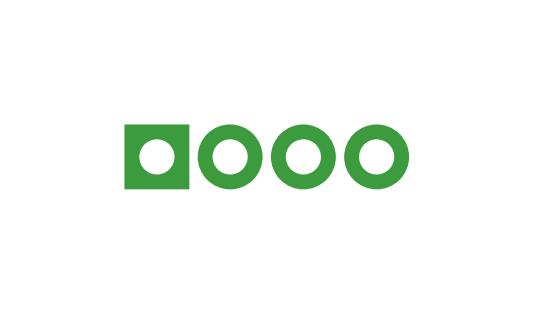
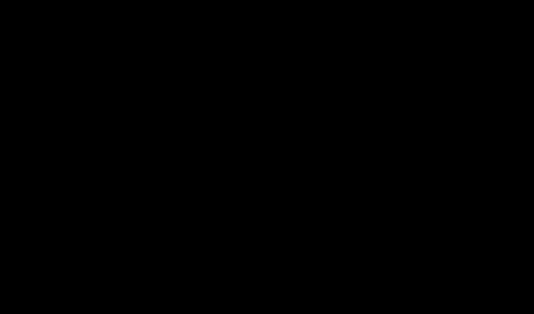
part: (266, 156) -> none

